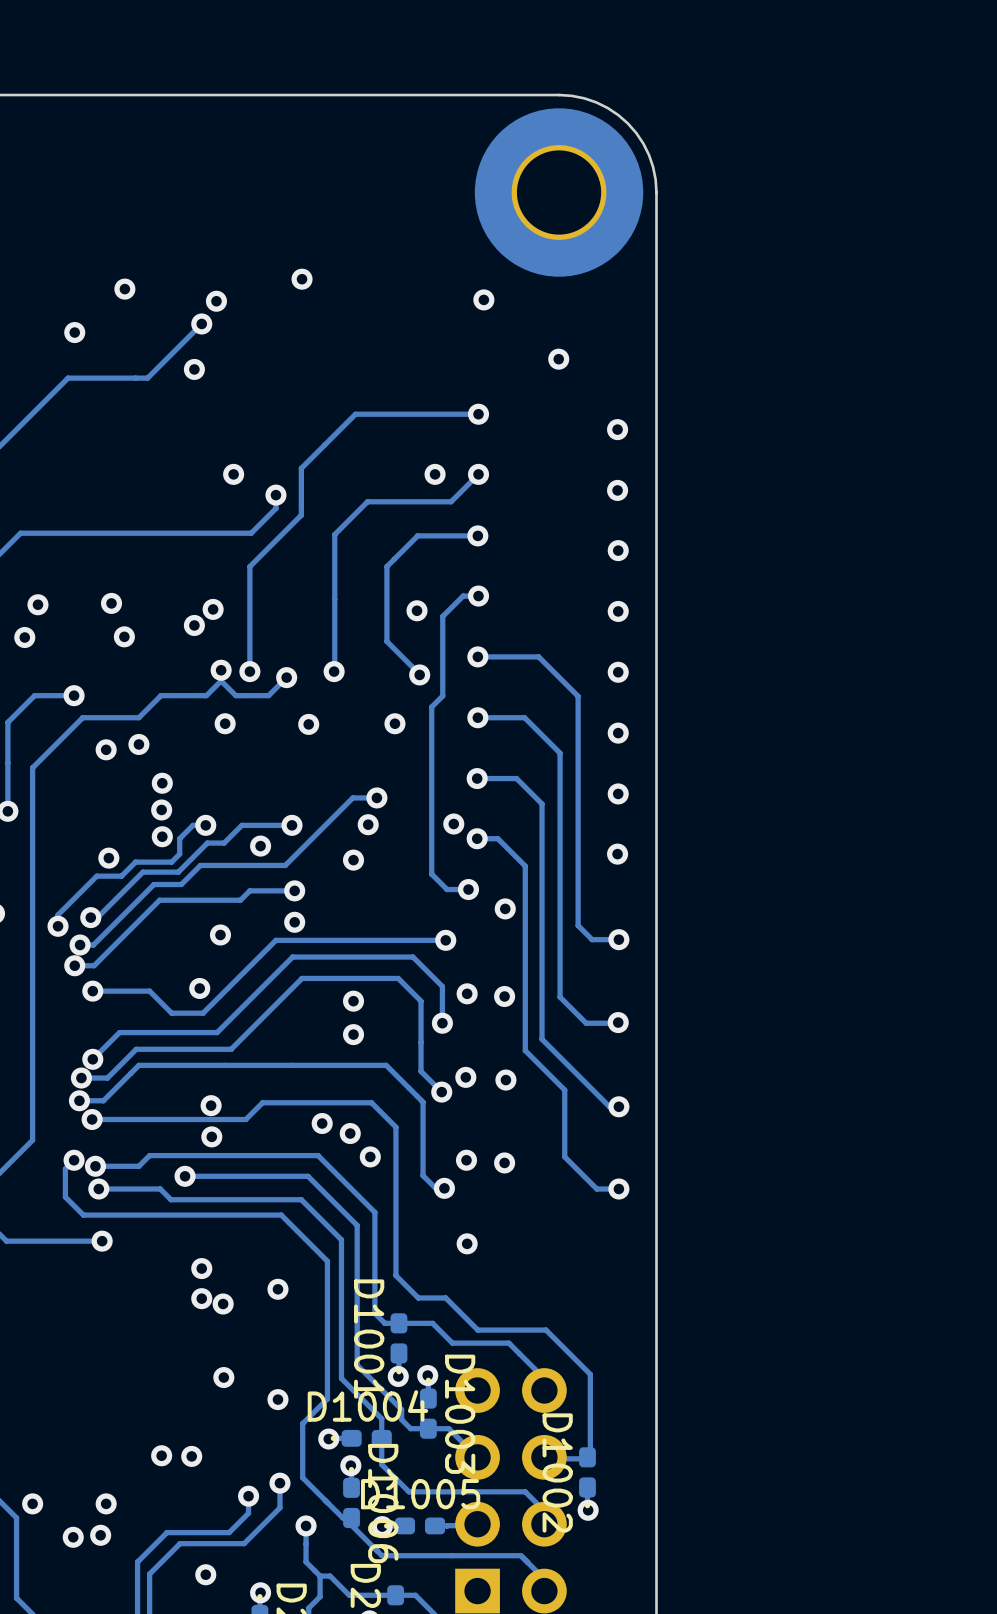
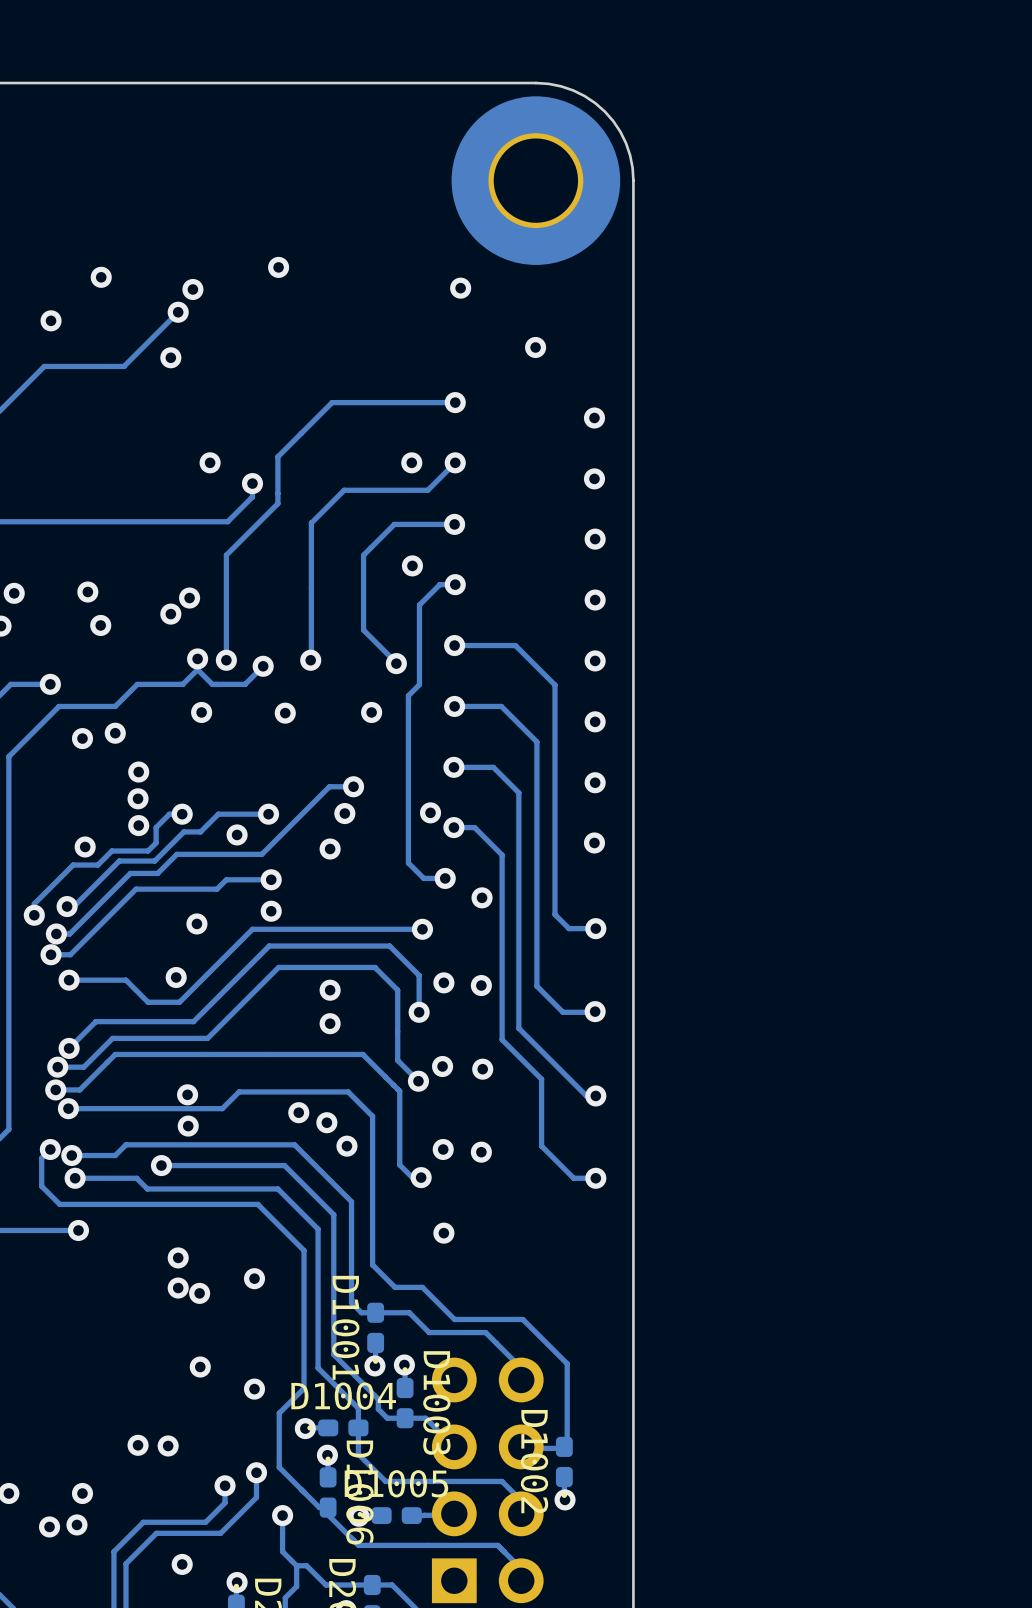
via position: (417, 610) -> (412, 565)

